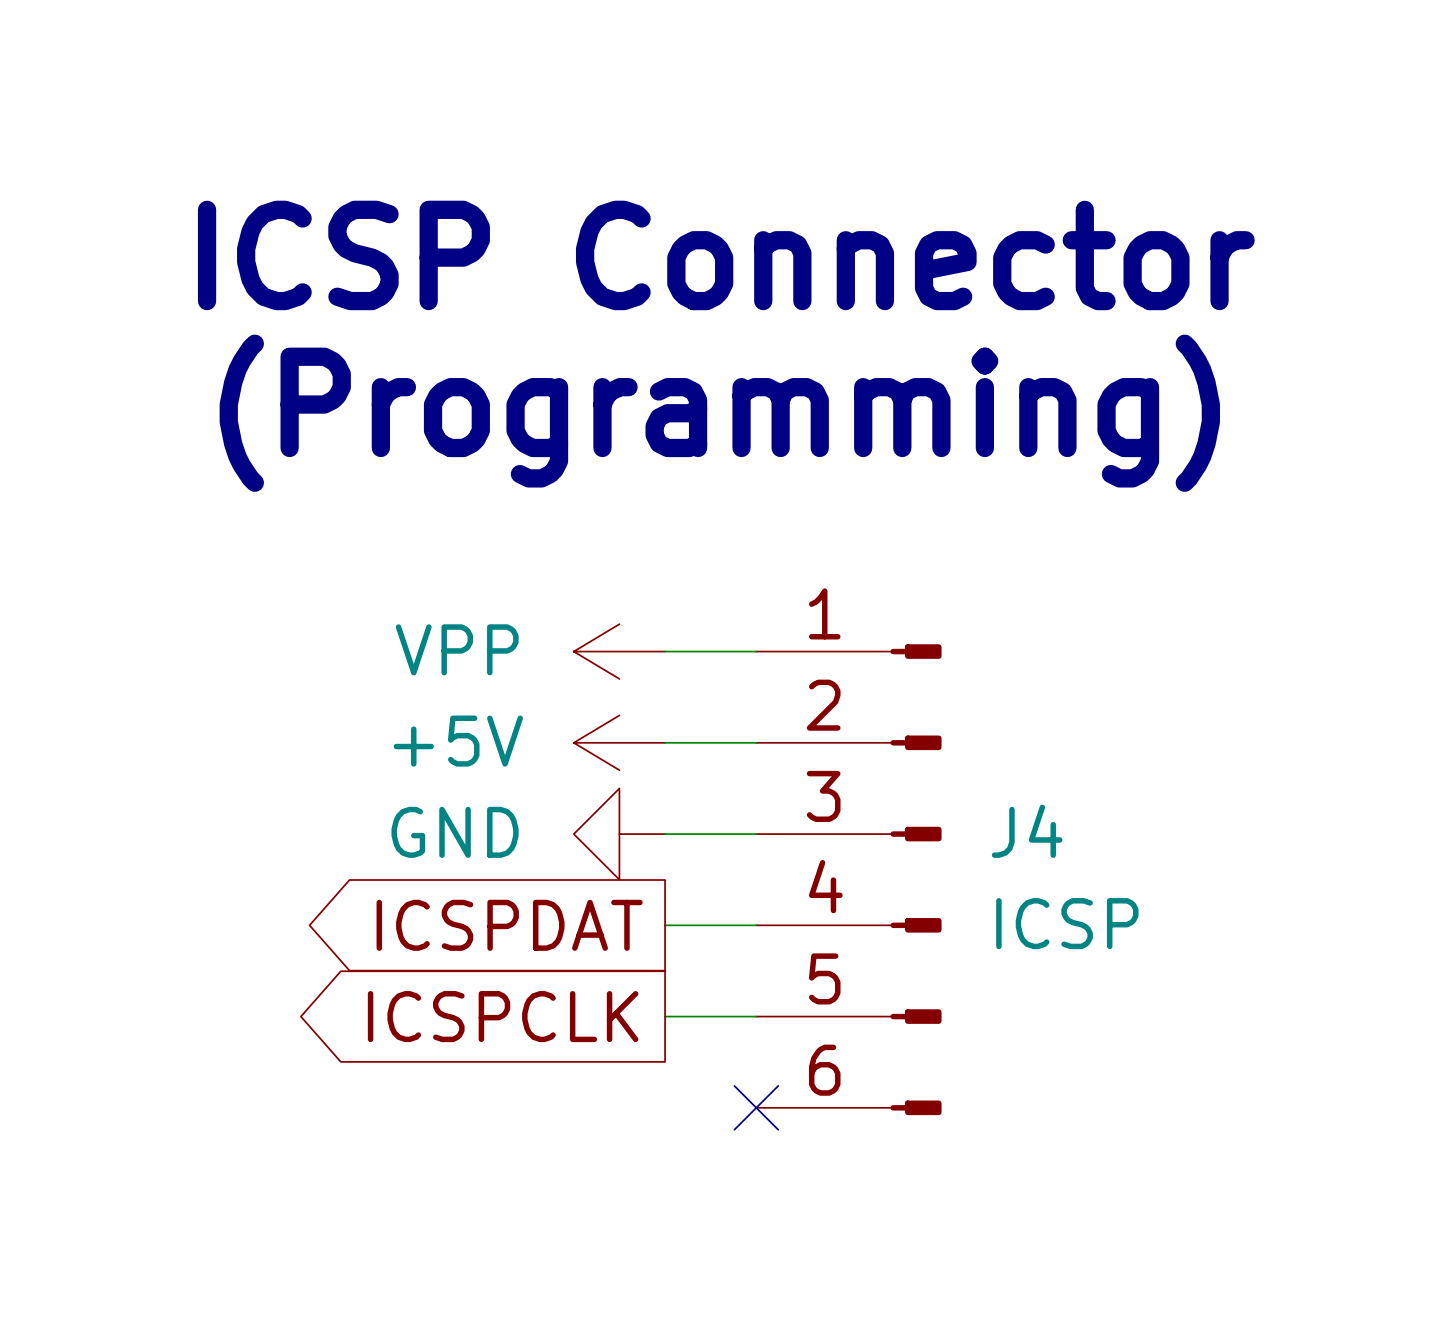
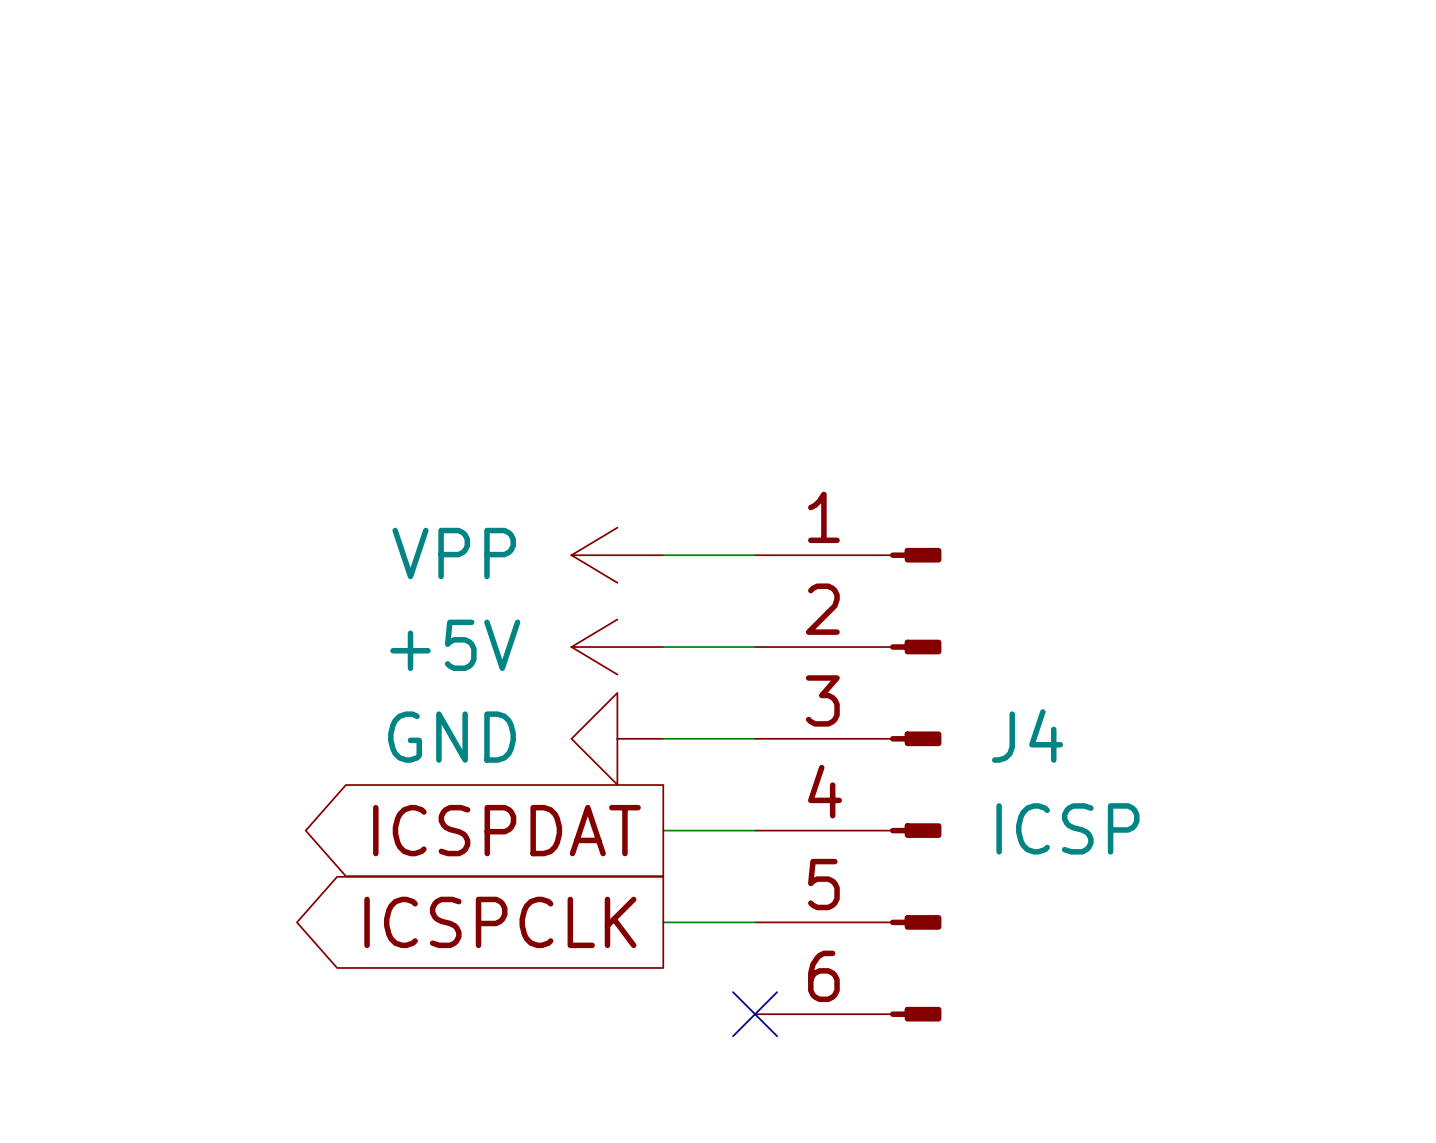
text: ICSP Connector (726, 255) -> none
text: (Programming) (719, 413) -> none

